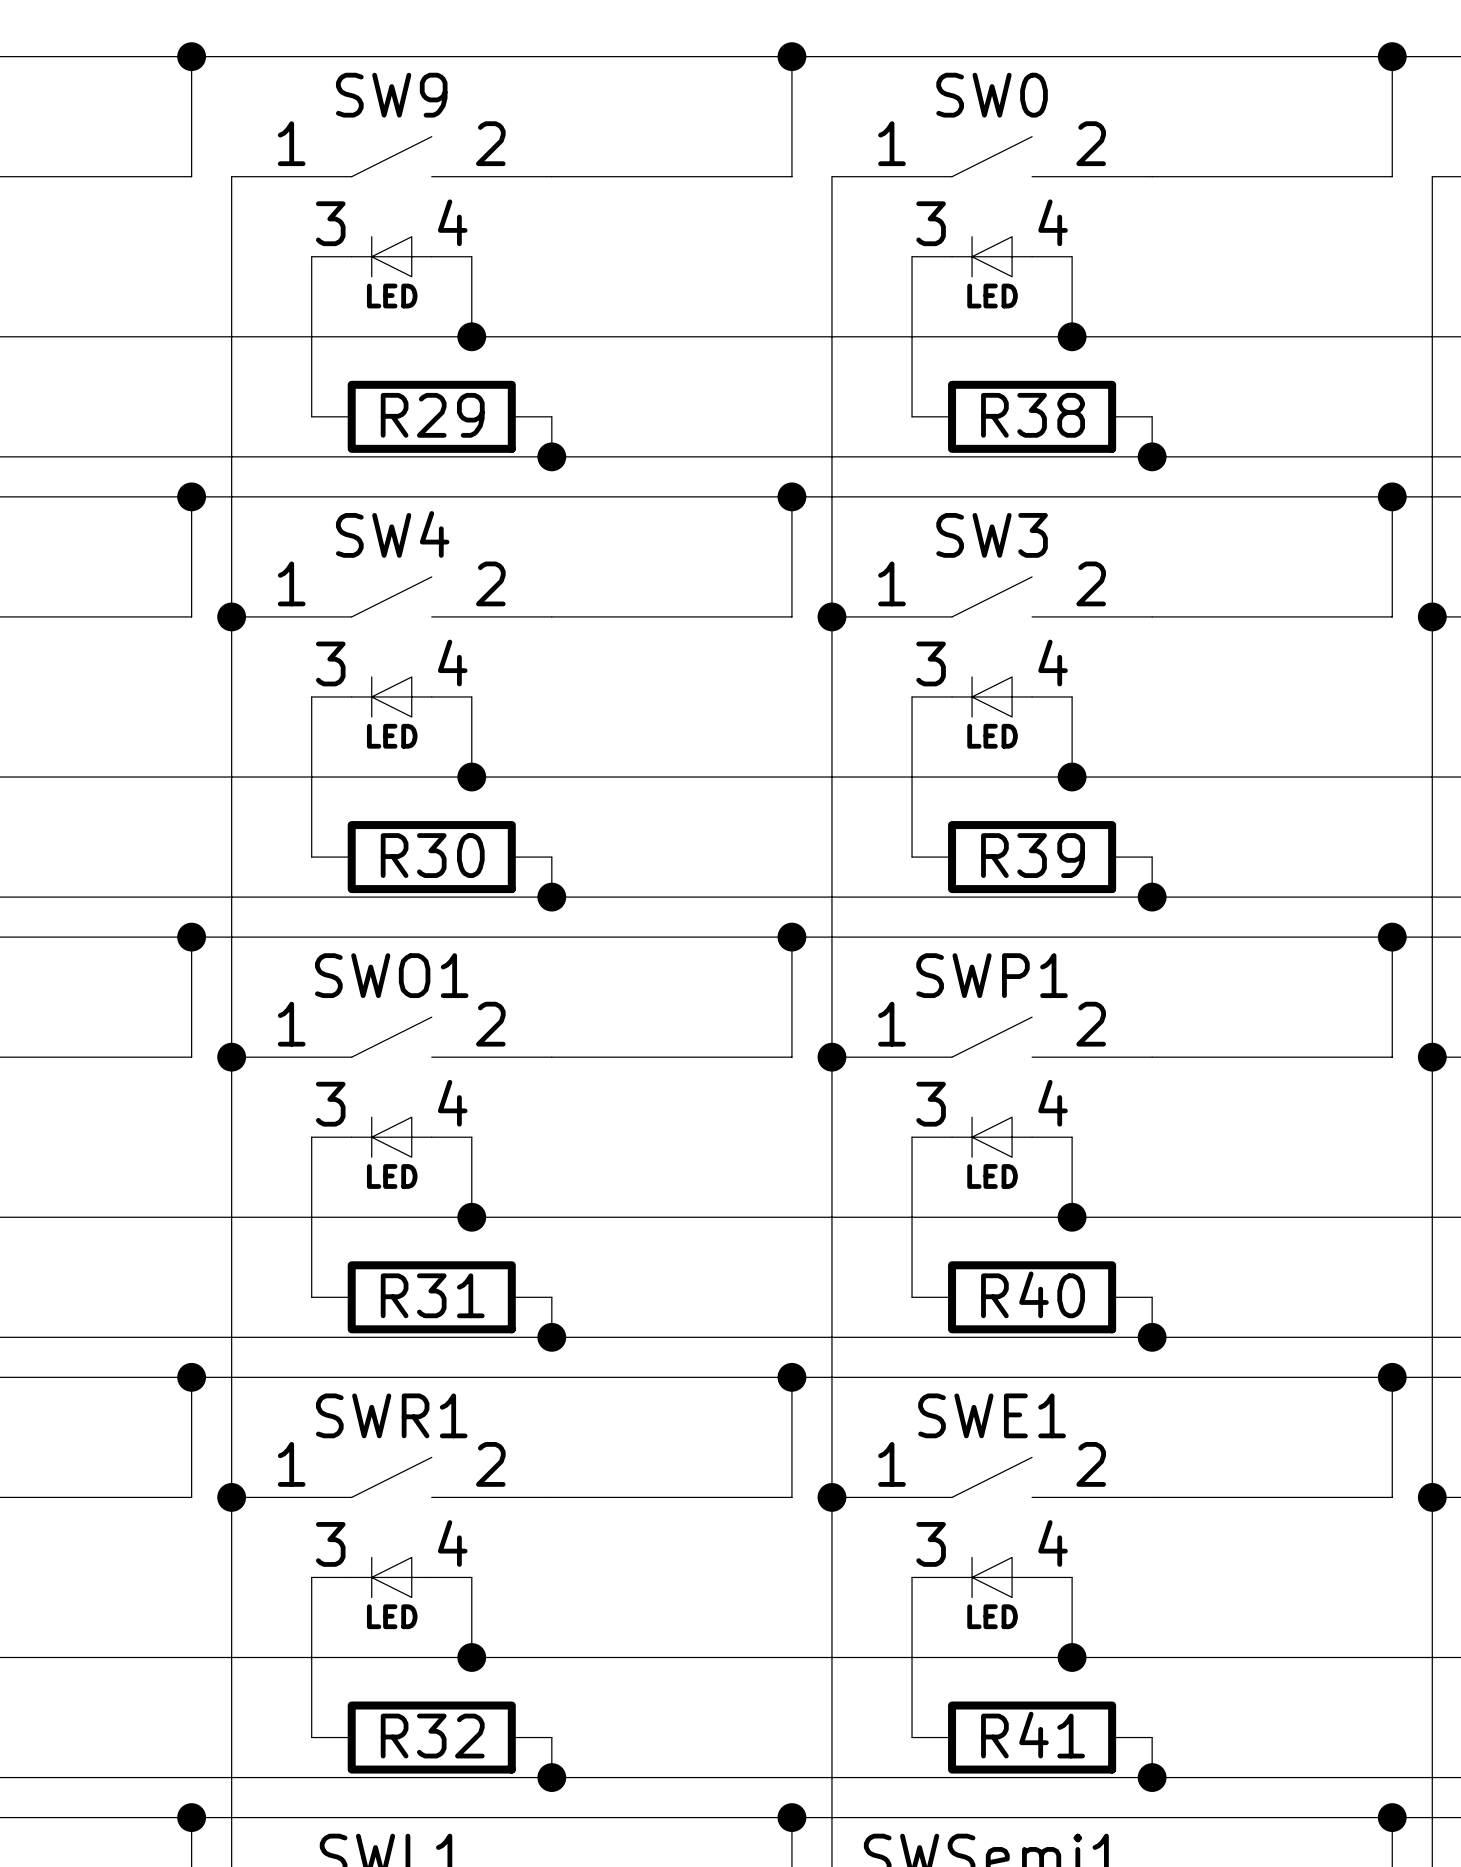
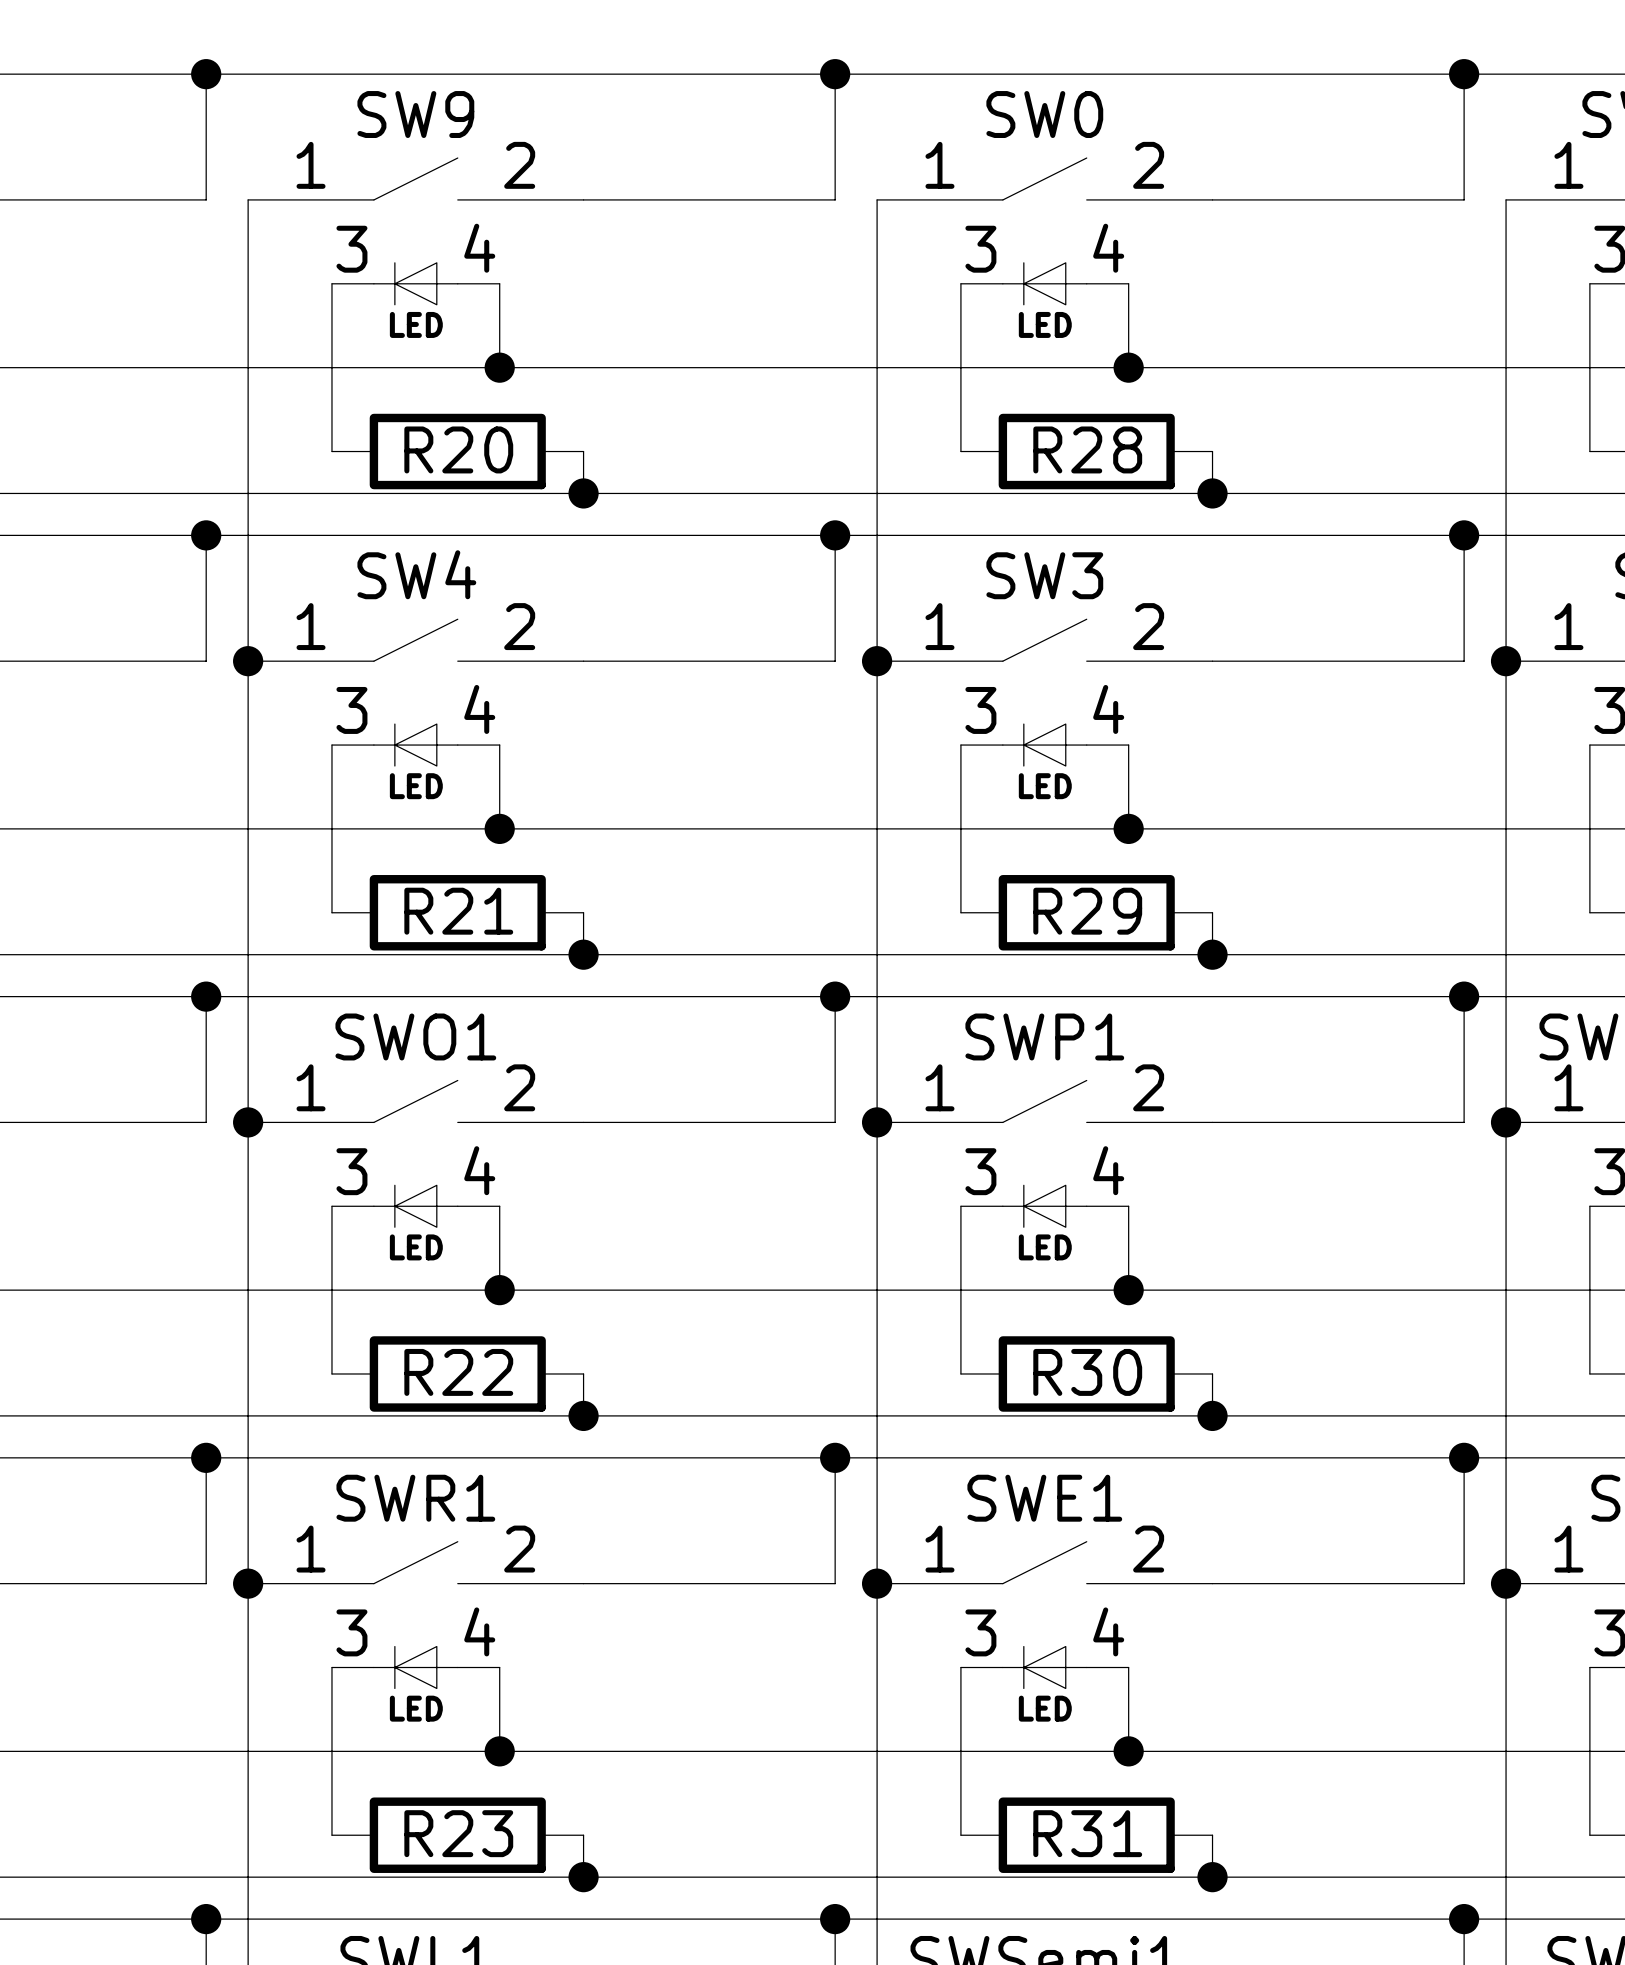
R29 name: R29 (432, 415) -> R20 (458, 449)
R38 name: R38 (1033, 415) -> R28 (1087, 449)
R30 name: R30 (432, 855) -> R21 (458, 911)
R39 name: R39 (1033, 855) -> R29 (1087, 911)
R40 name: R40 (1033, 1294) -> R30 (1087, 1372)
R31 name: R31 (432, 1295) -> R22 (458, 1372)
R41 name: R41 (1033, 1735) -> R31 (1087, 1833)
R32 name: R32 (432, 1736) -> R23 (458, 1833)

